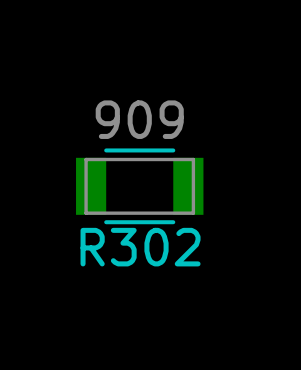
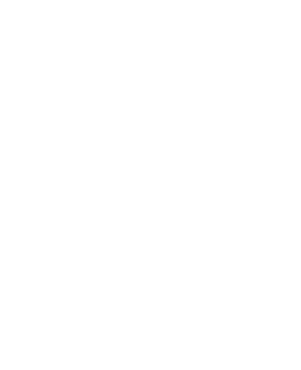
R302: 909 (139, 186) -> none

